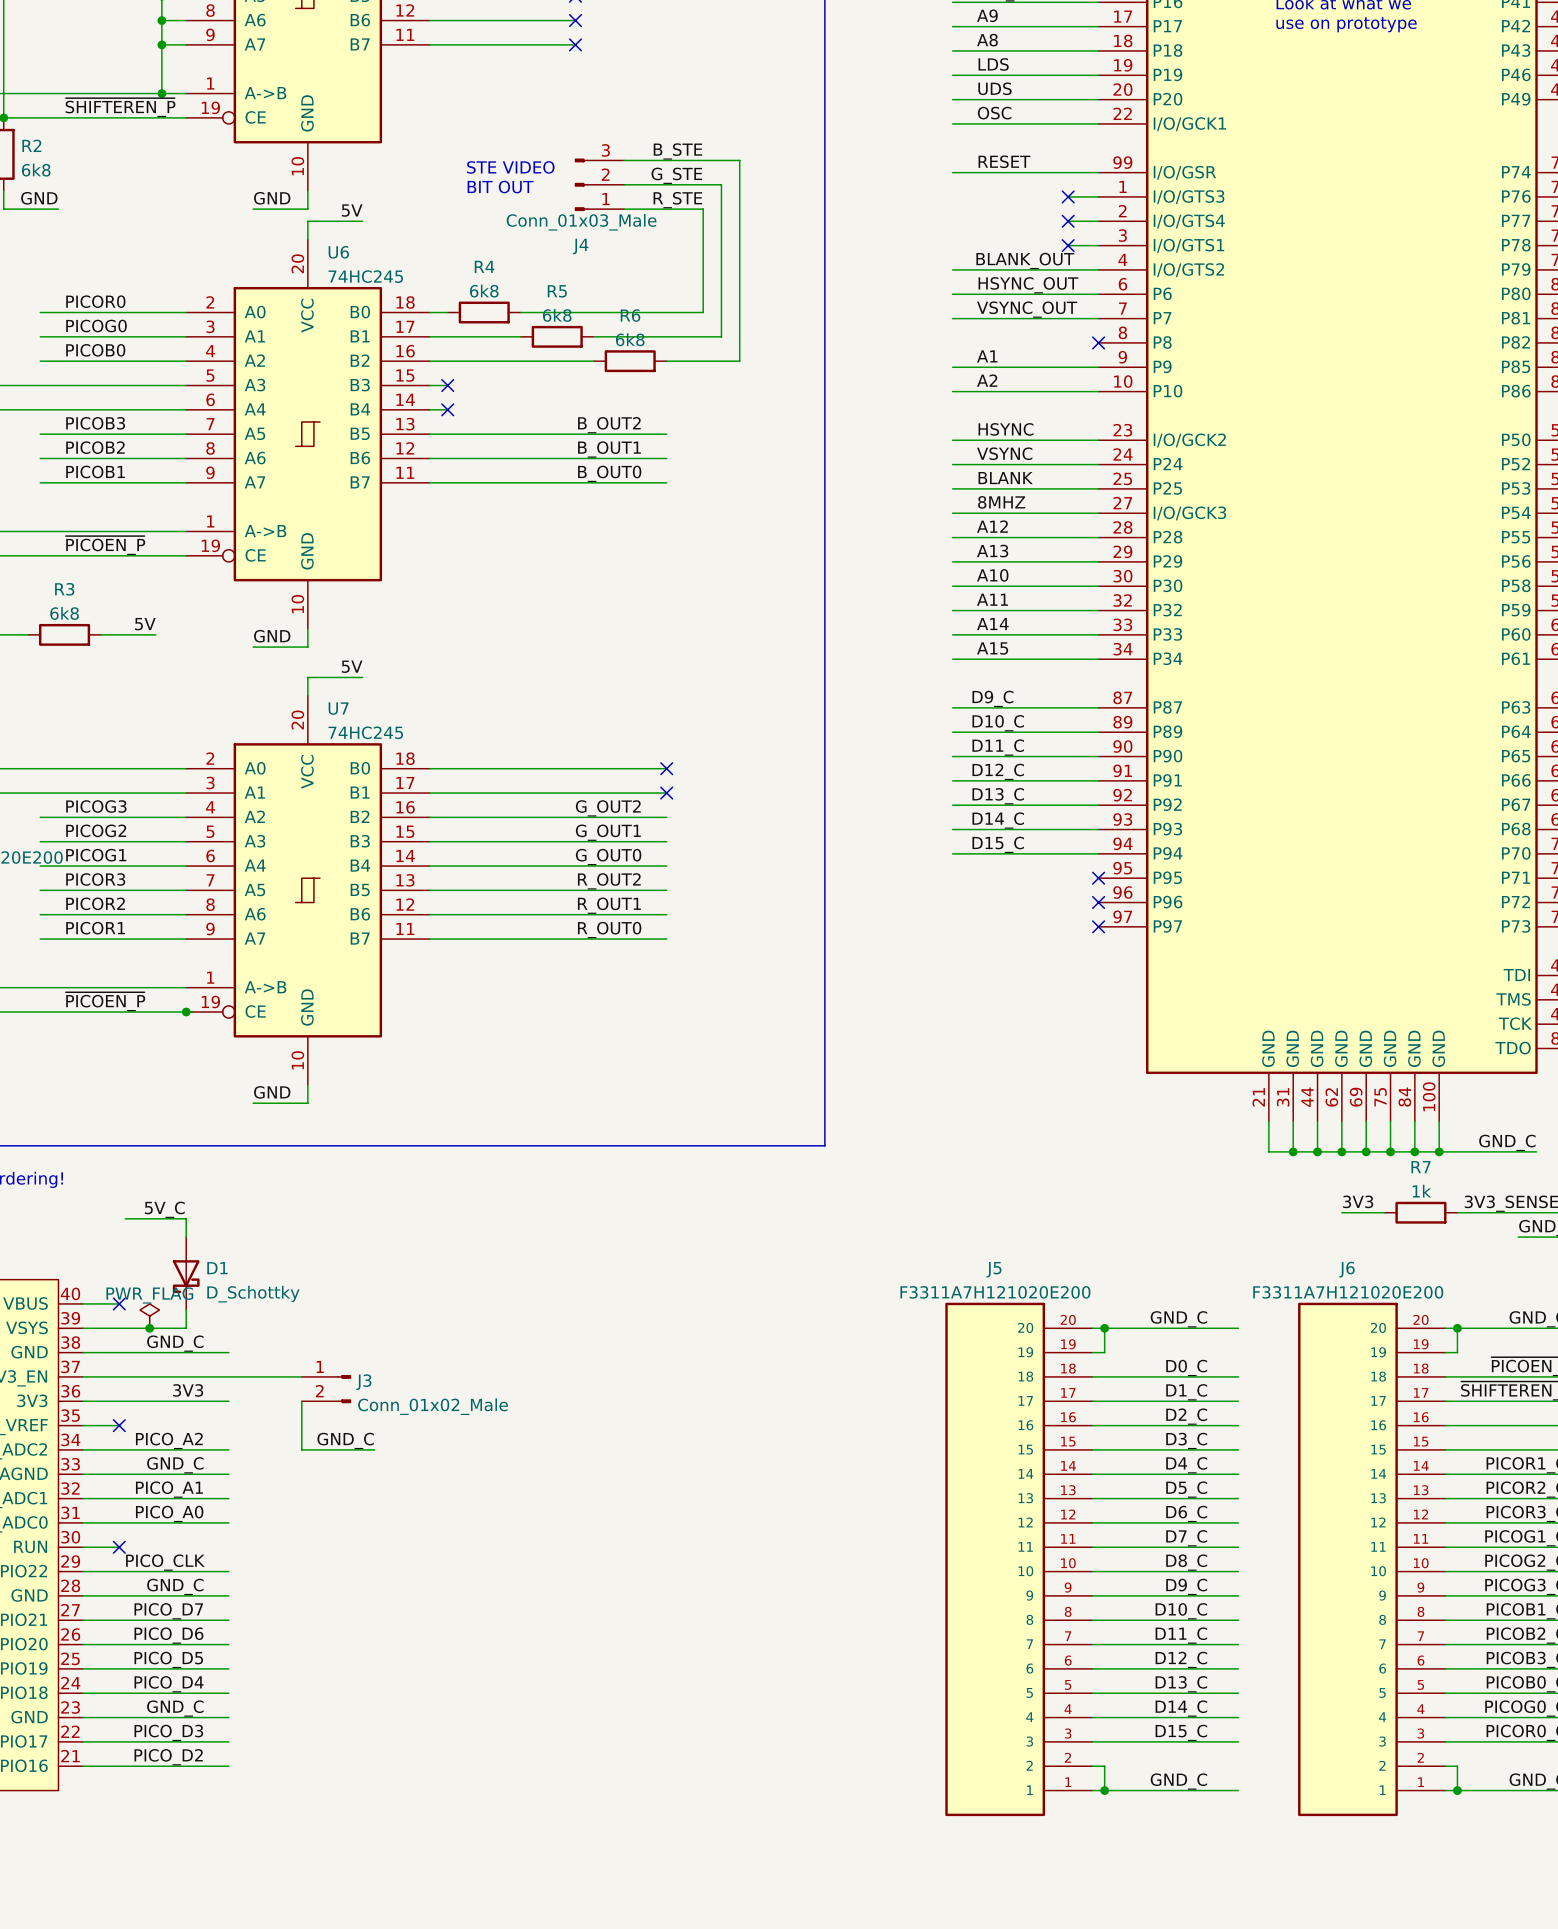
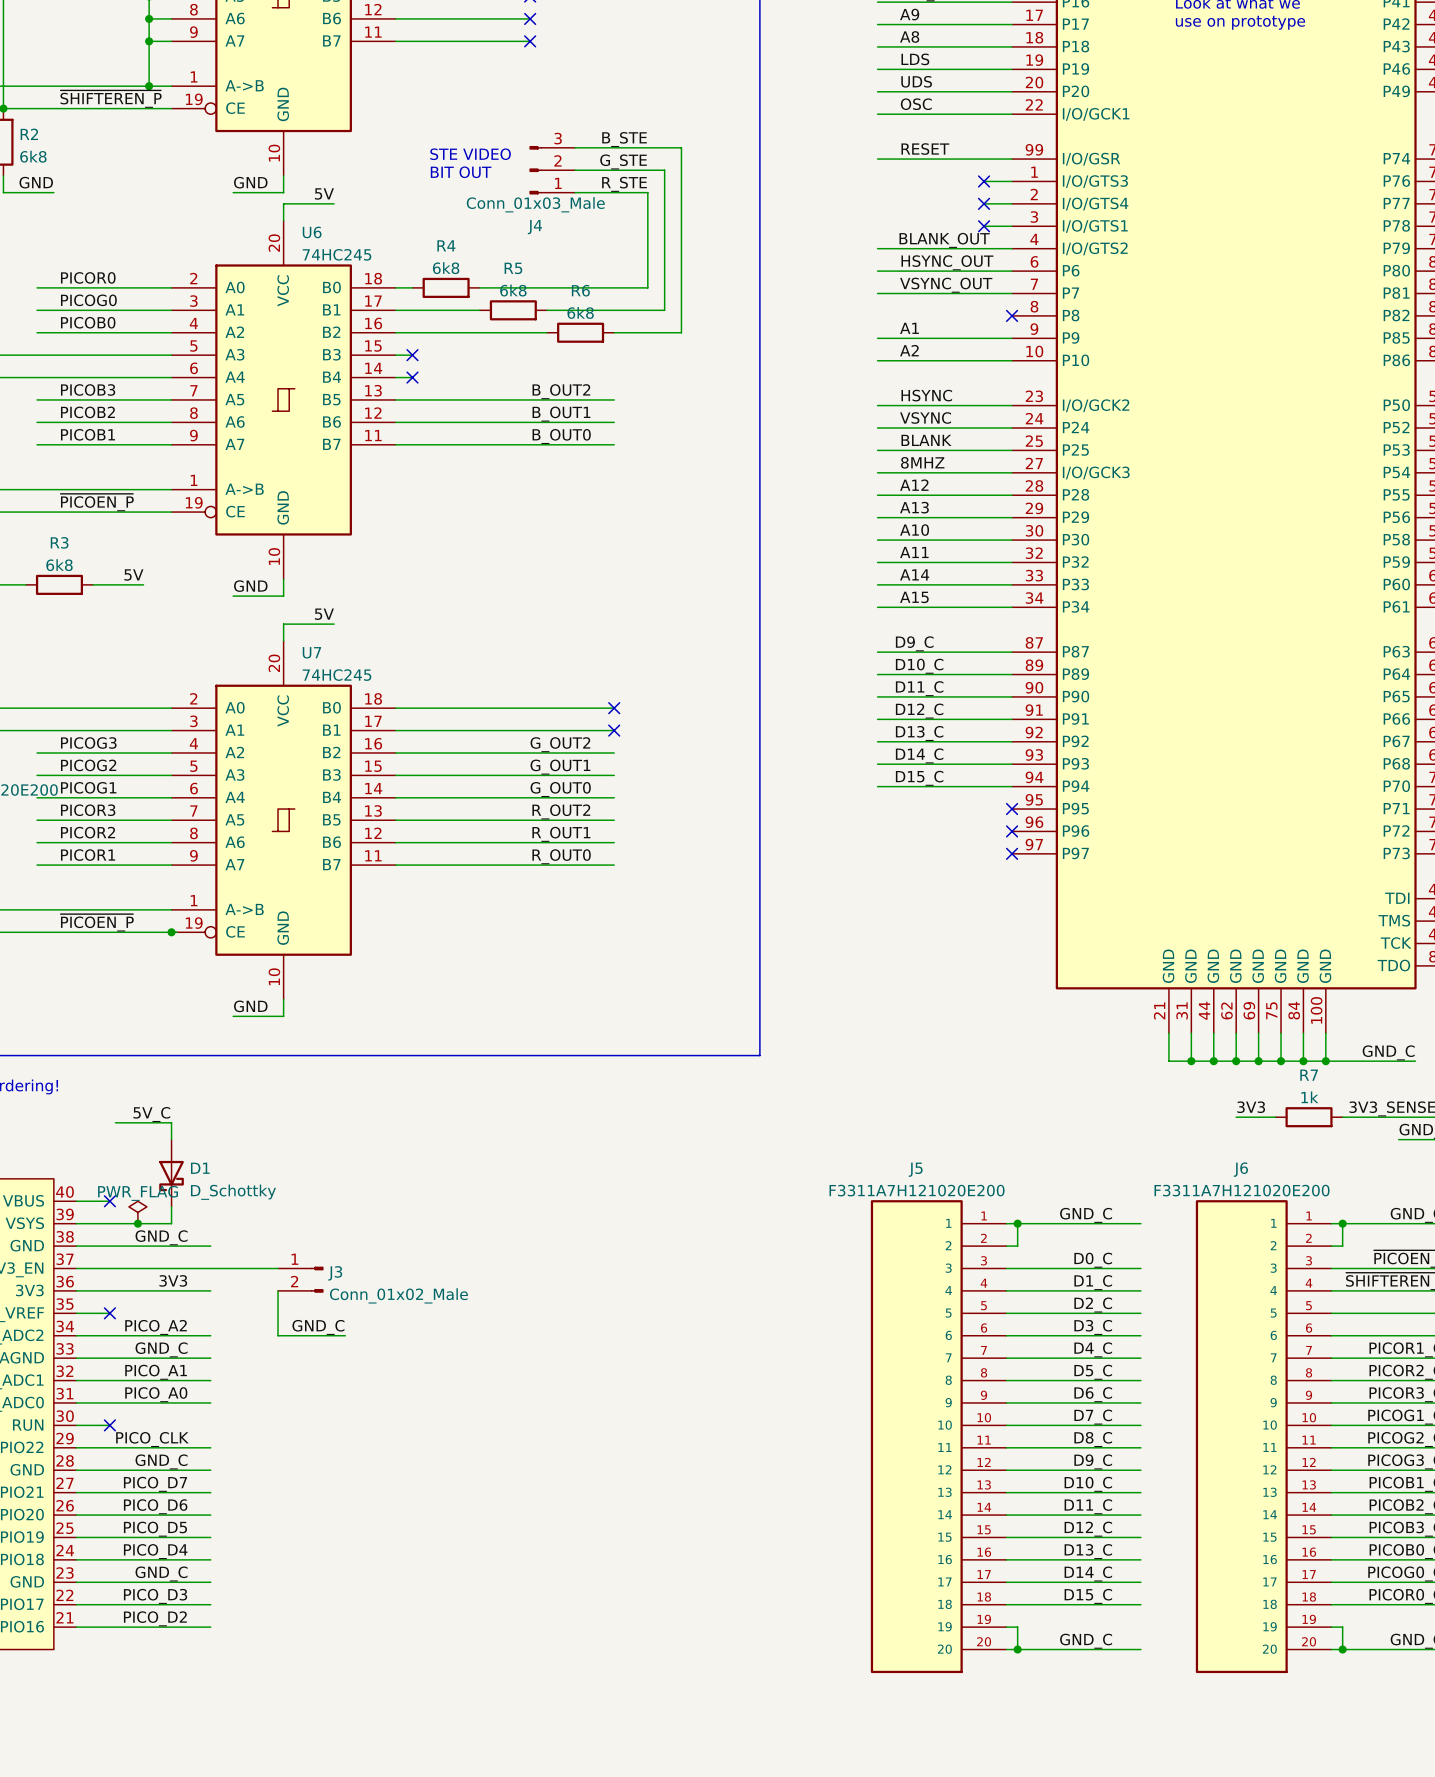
J5 flip: as is (995, 1559) -> up-down (916, 1436)
J6 flip: as is (1347, 1559) -> up-down (1241, 1436)

